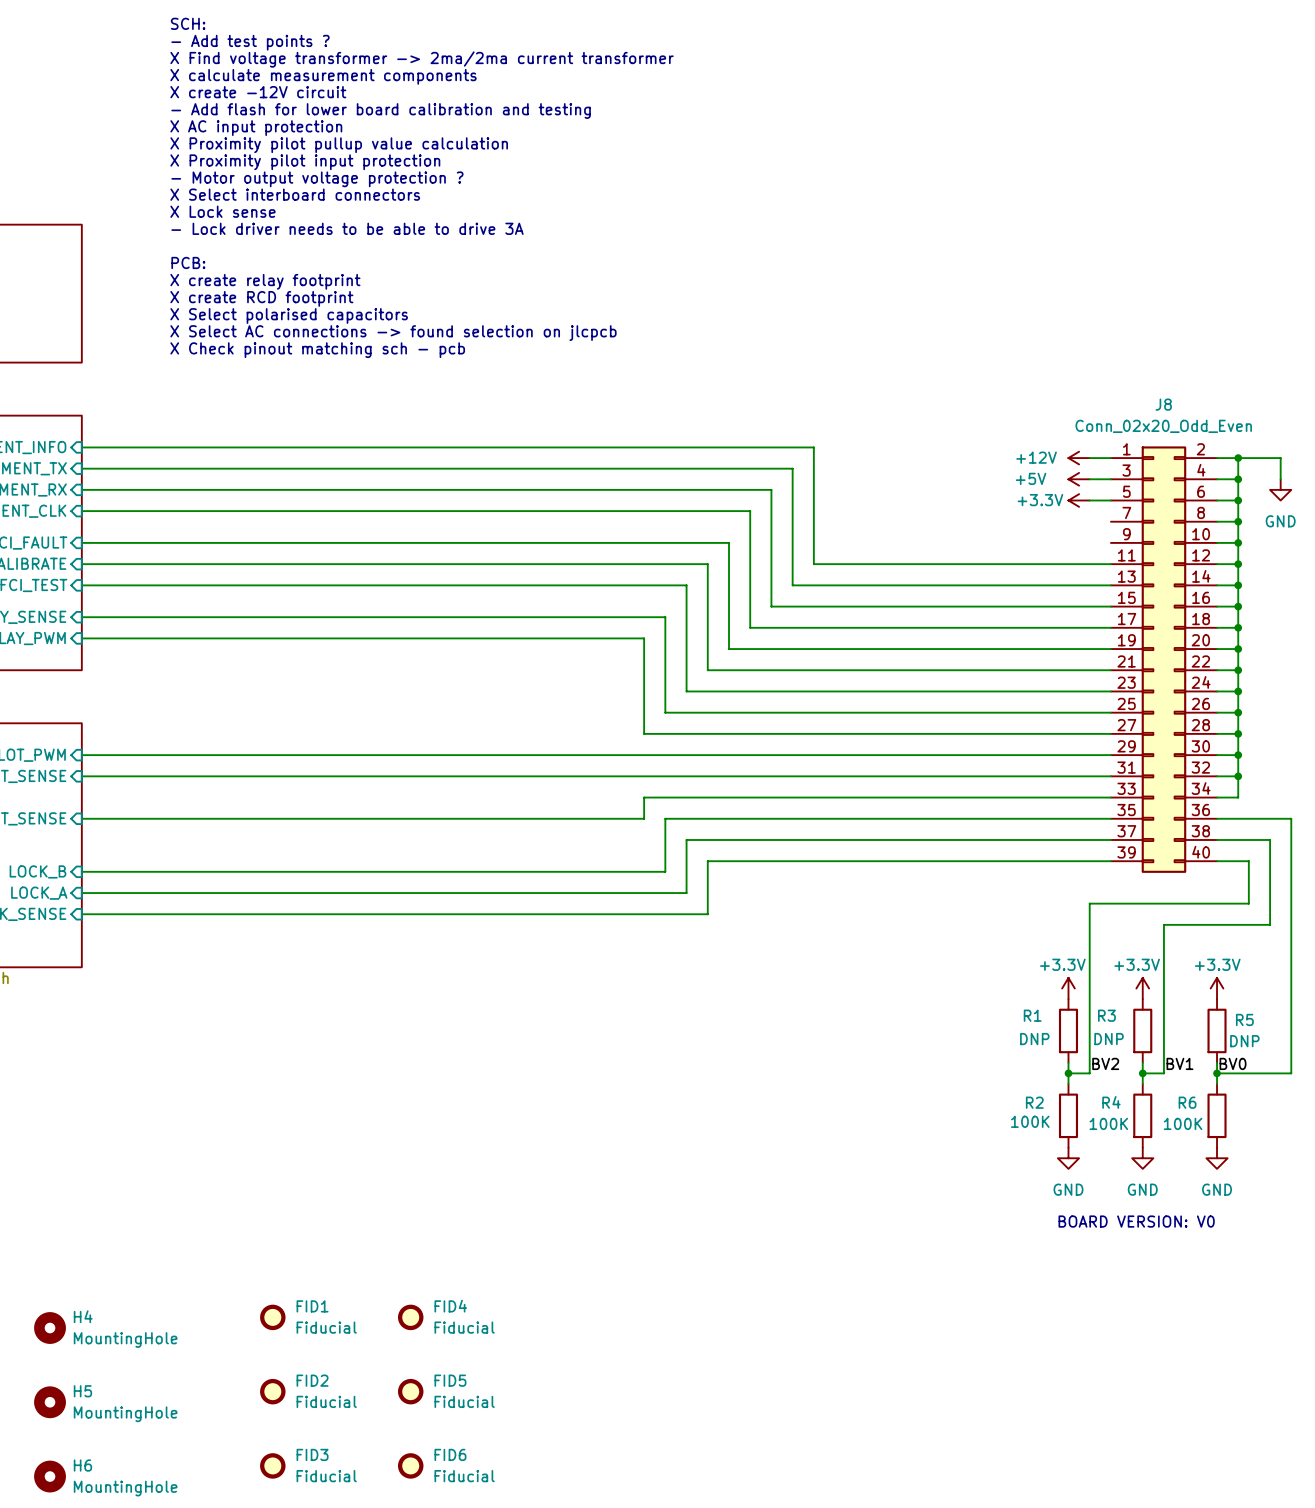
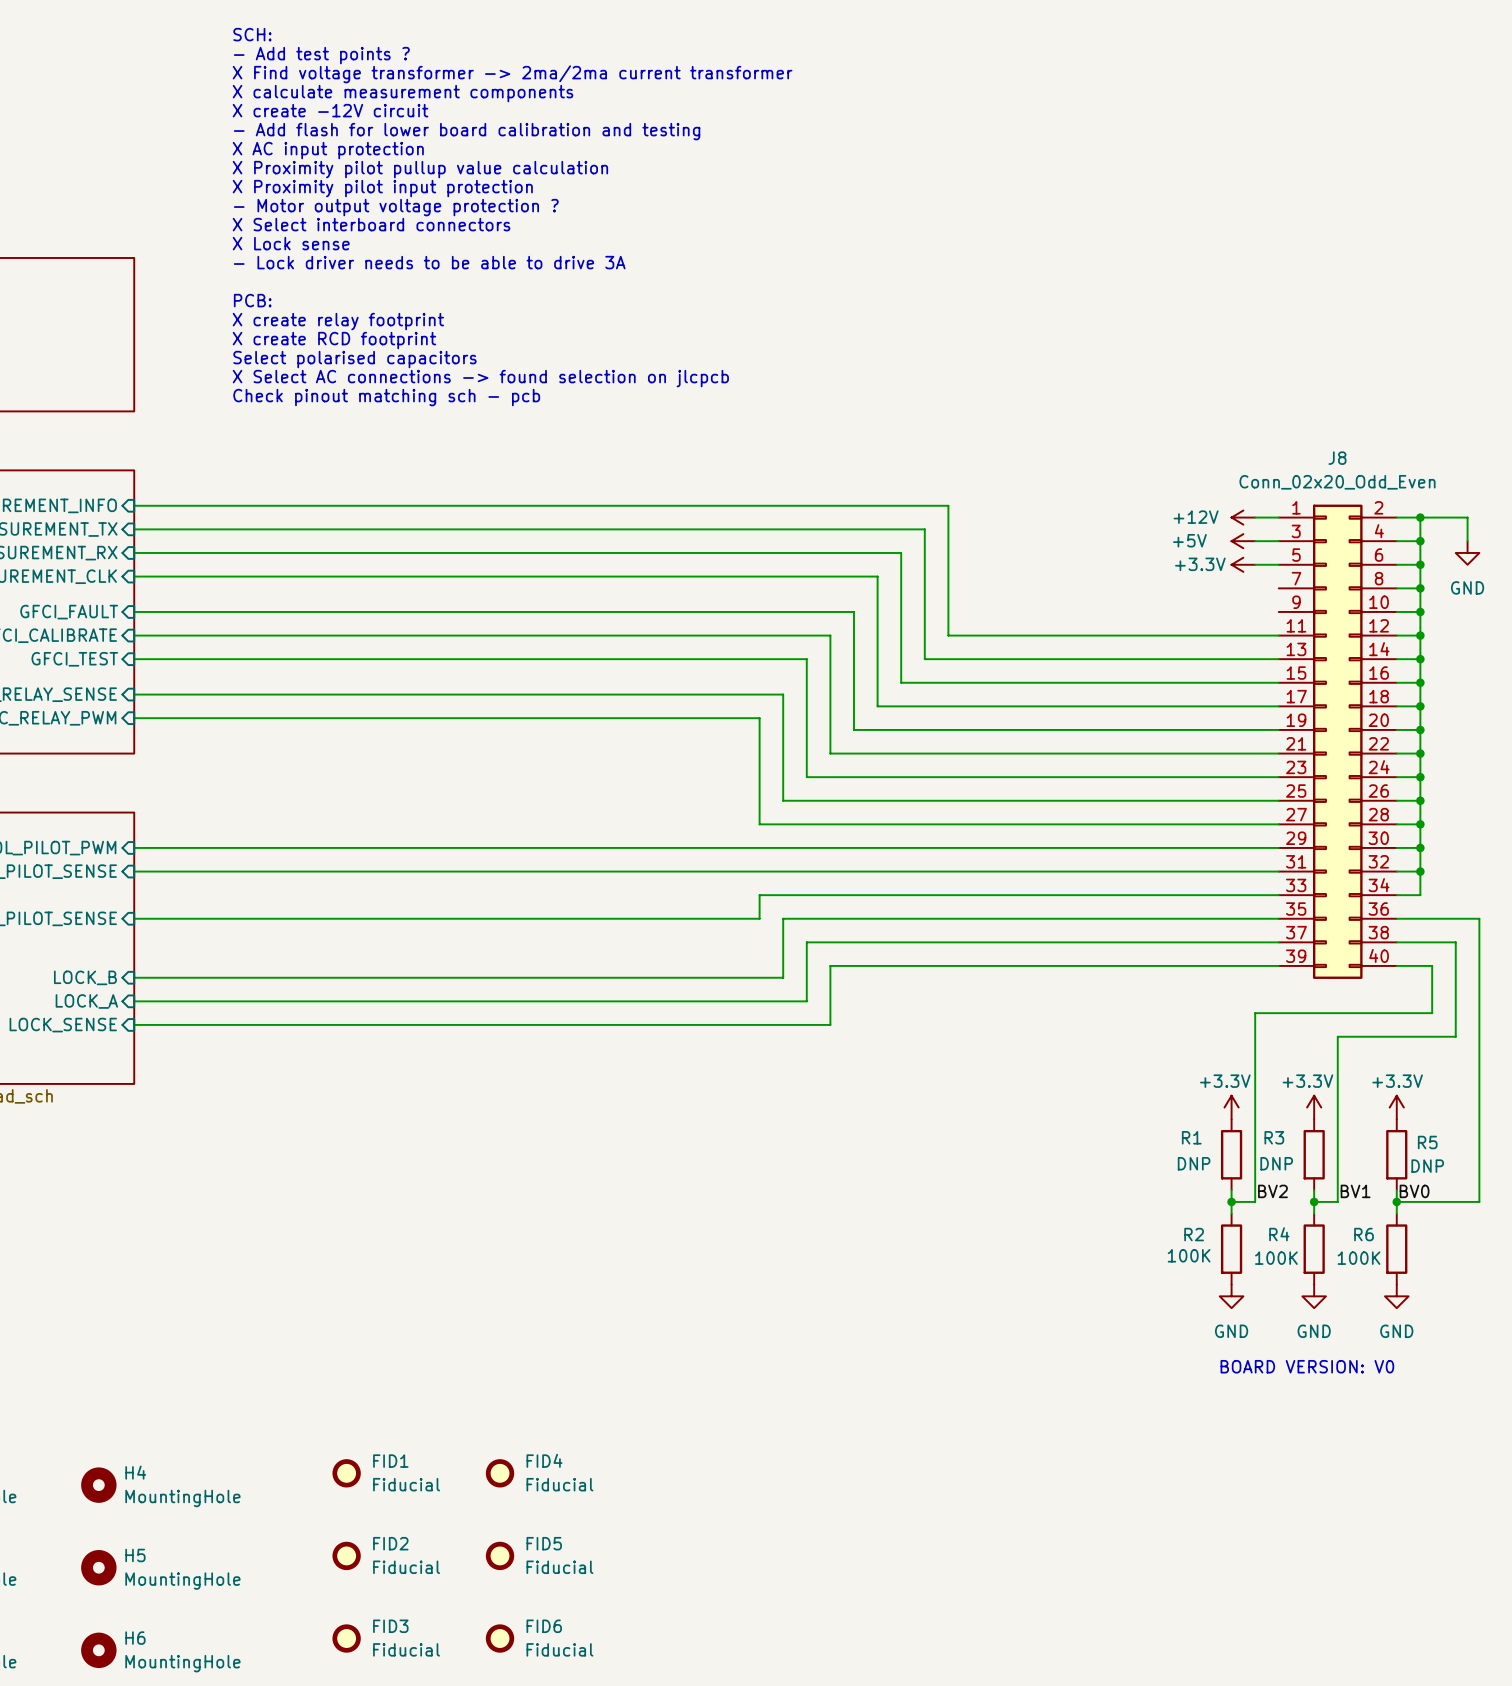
text: X Select polarised capacitors (289, 315) -> Select polarised capacitors (354, 359)
text: X Check pinout matching sch - pcb (317, 350) -> Check pinout matching sch - pcb (386, 397)

